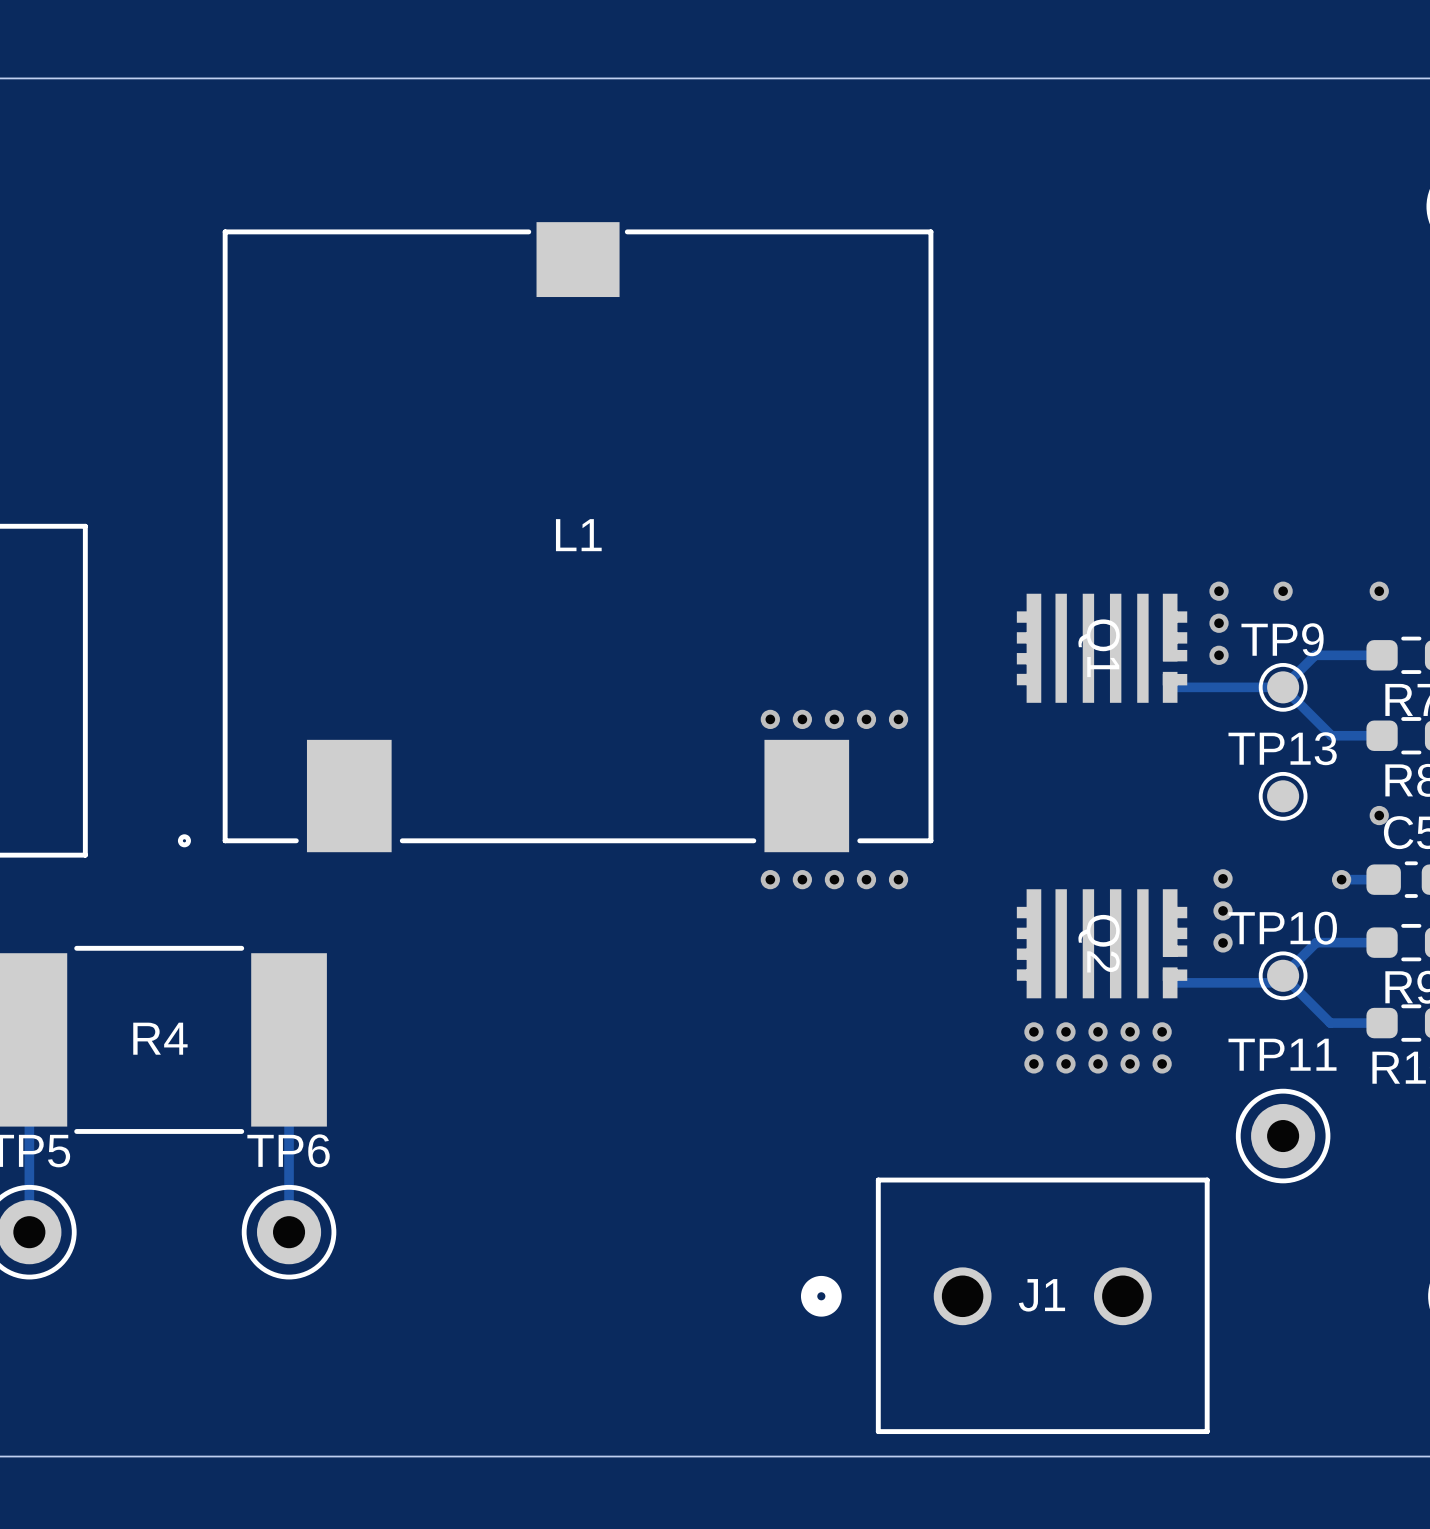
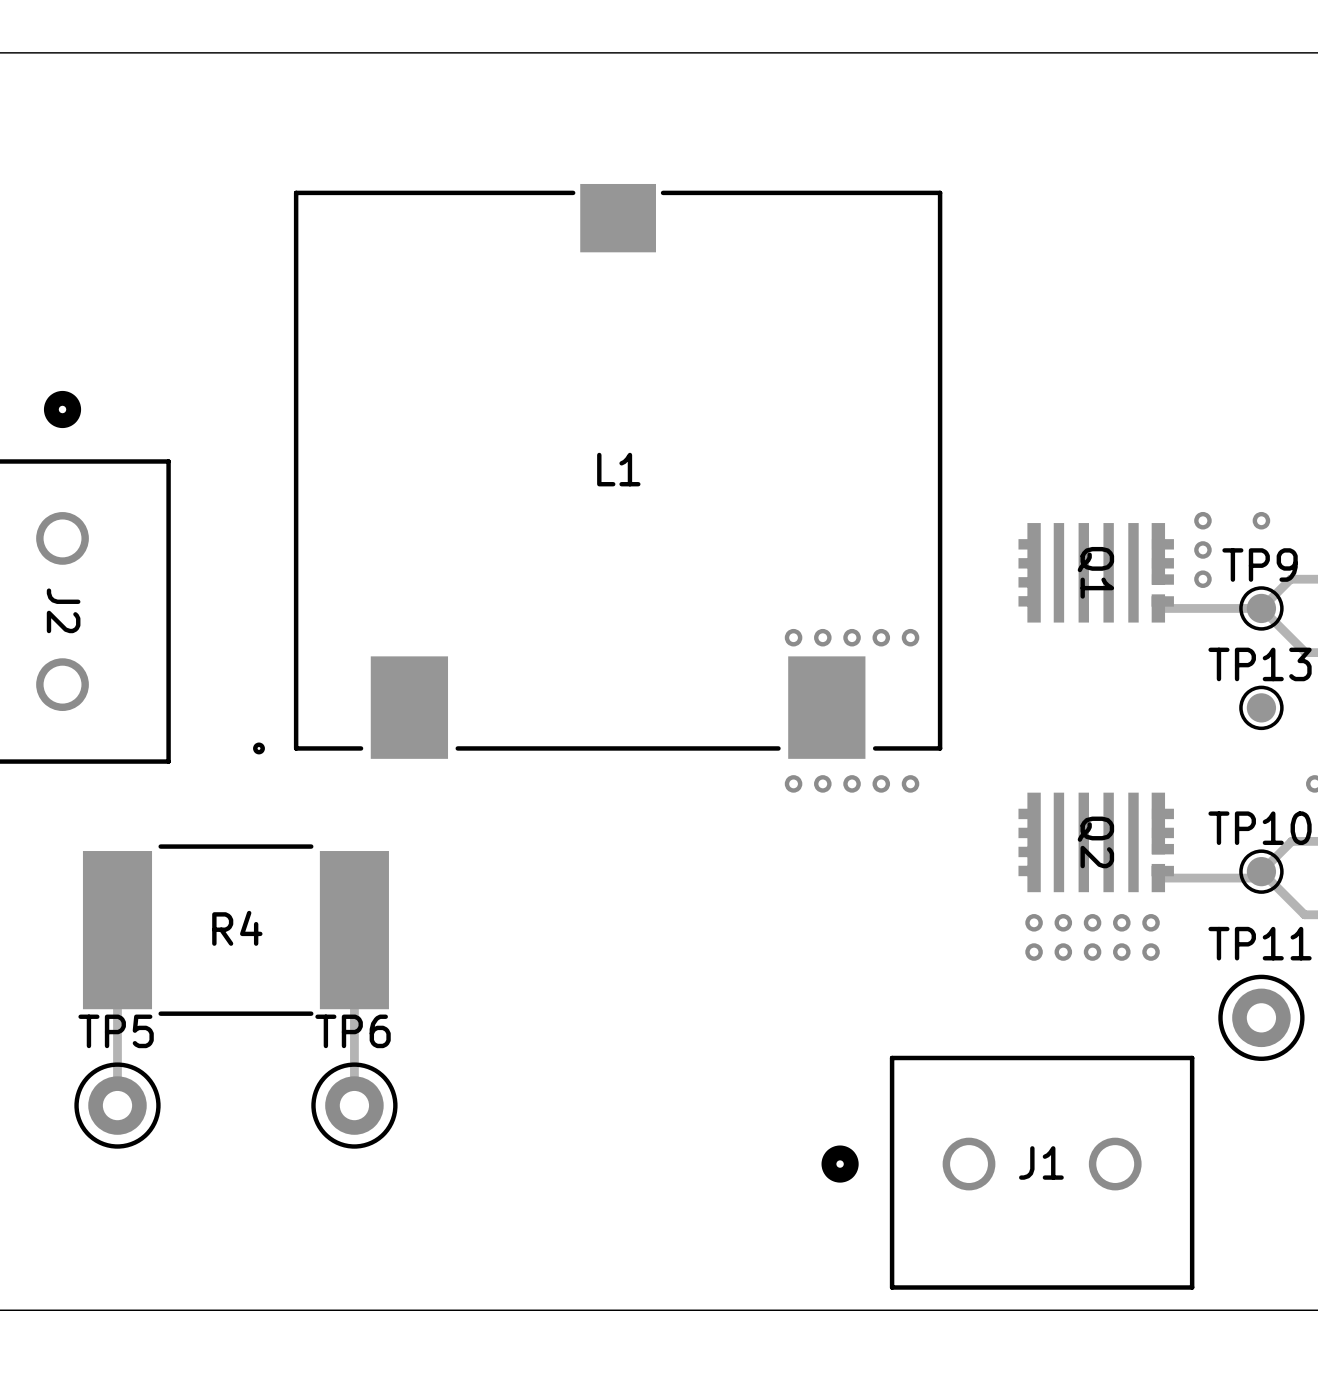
via: (1223, 878) -> none
via: (1223, 910) -> none
via: (1223, 942) -> none

